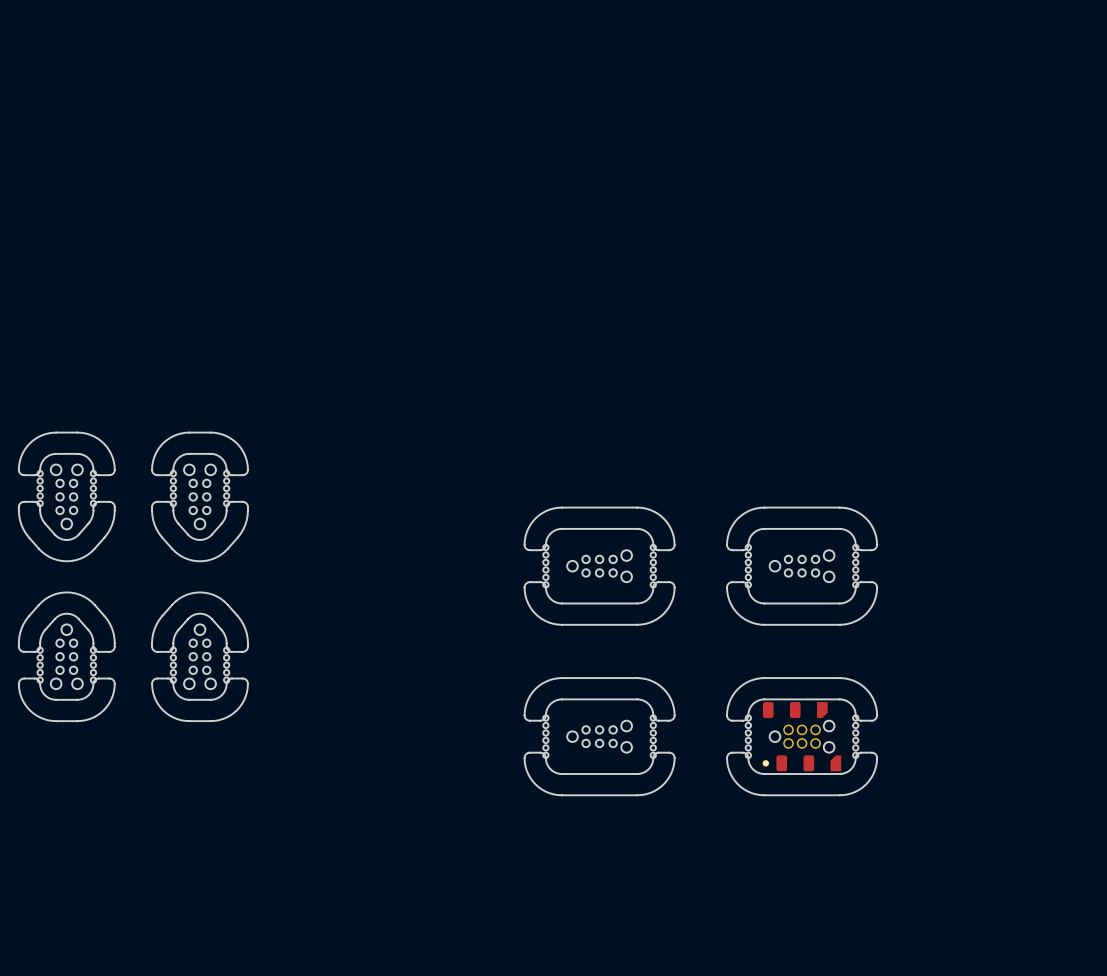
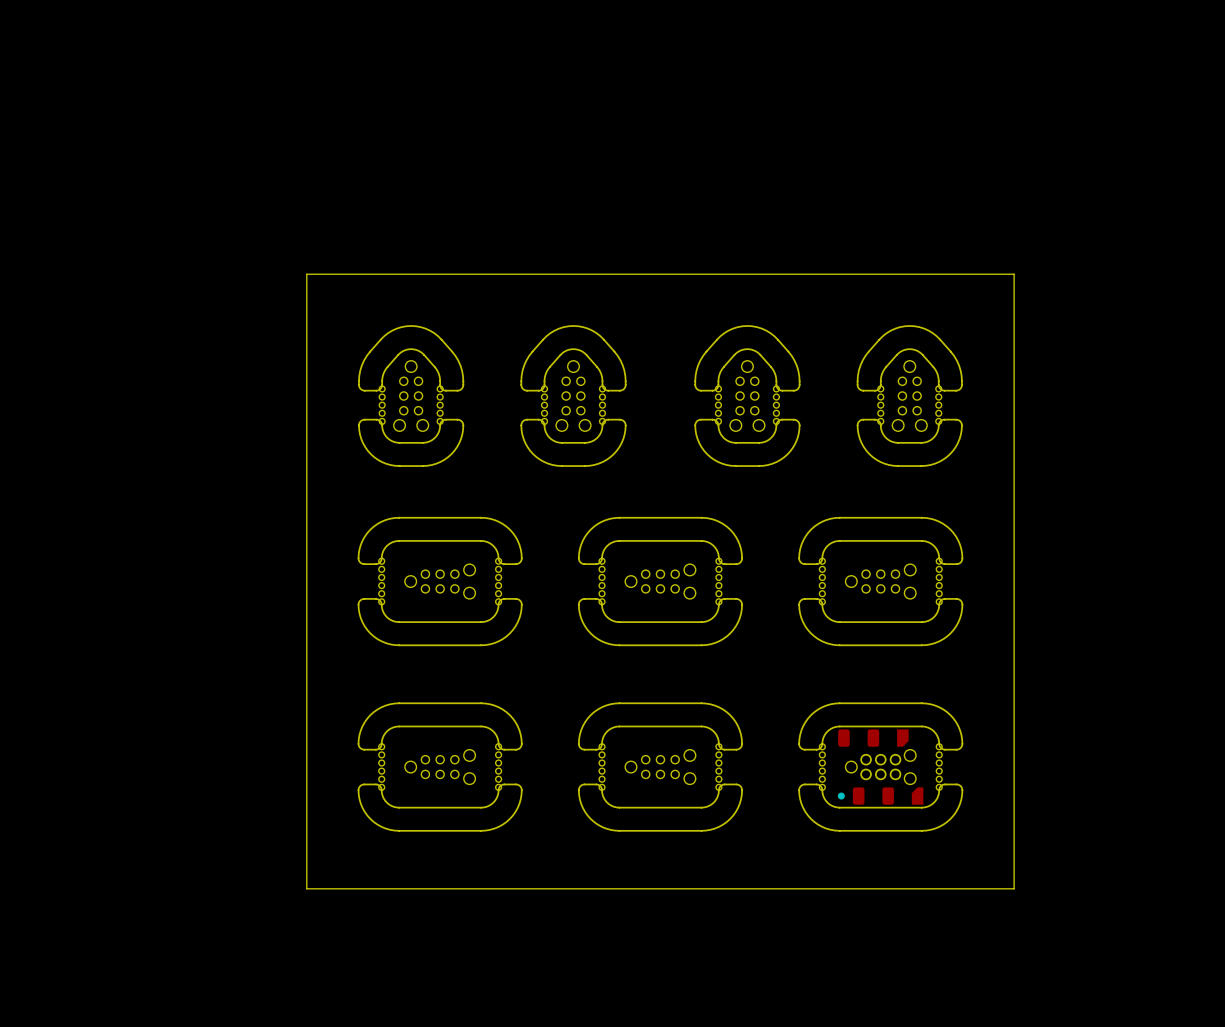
board edge: none -> (306, 274) (1014, 274) (1014, 888) (306, 888) (306, 274)
part: none -> (411, 396)
part: none -> (573, 396)
part: none -> (747, 396)
part: none -> (909, 396)
part: (66, 496) -> none
part: (200, 496) -> none
part: none -> (440, 581)
part: (66, 656) -> none
part: (200, 656) -> none
part: none -> (440, 767)

